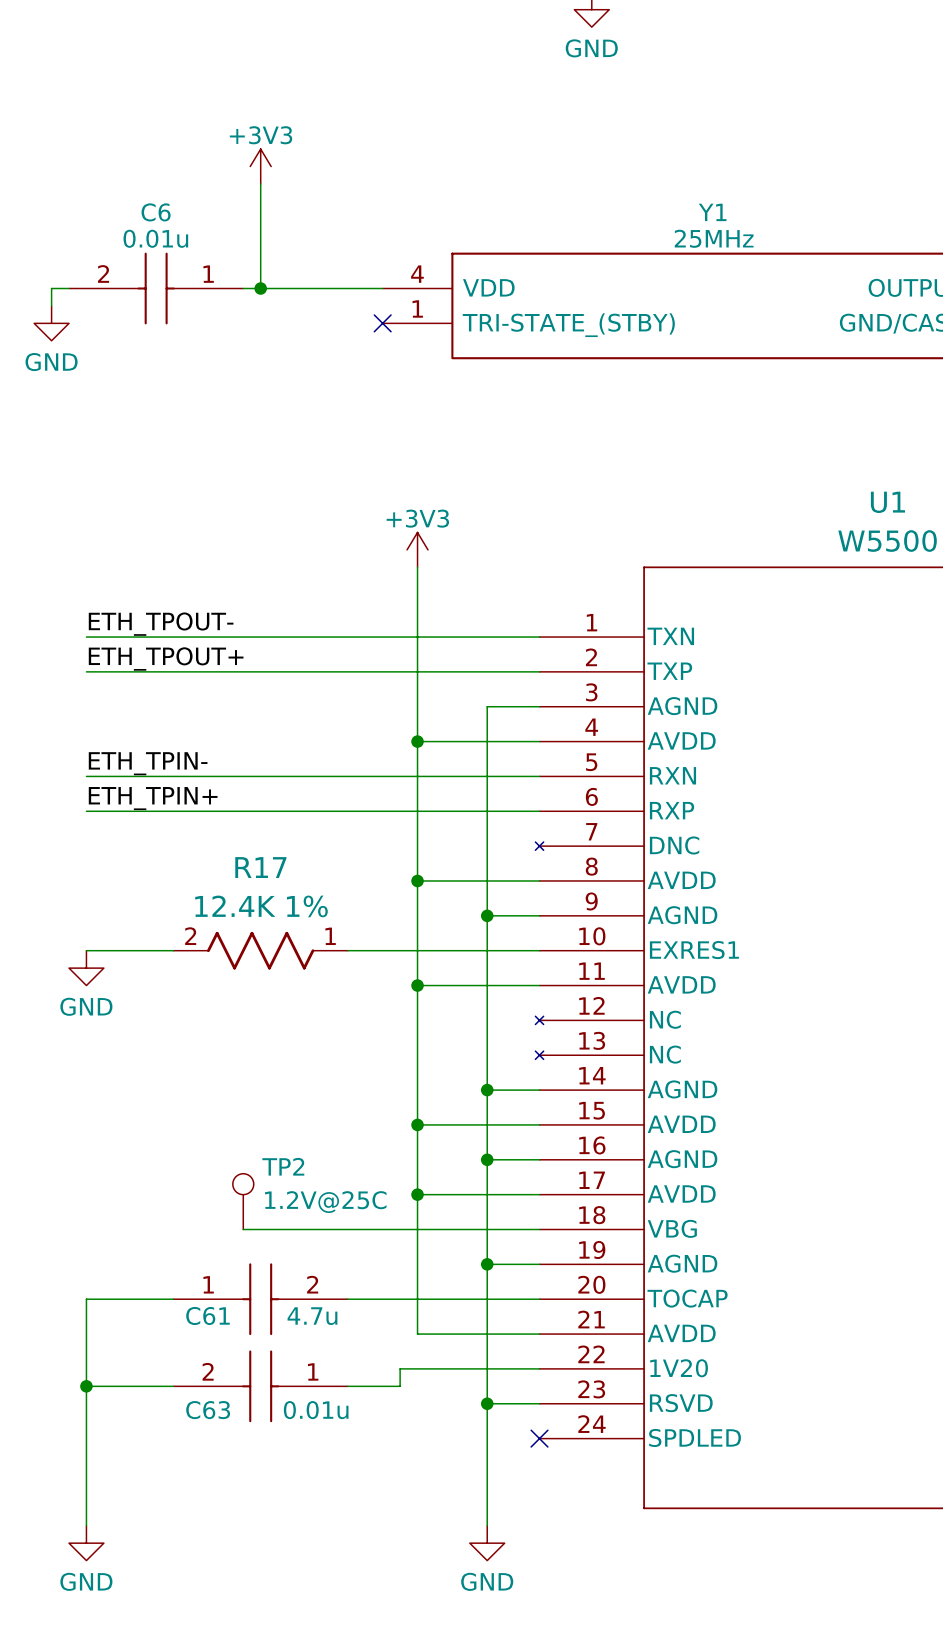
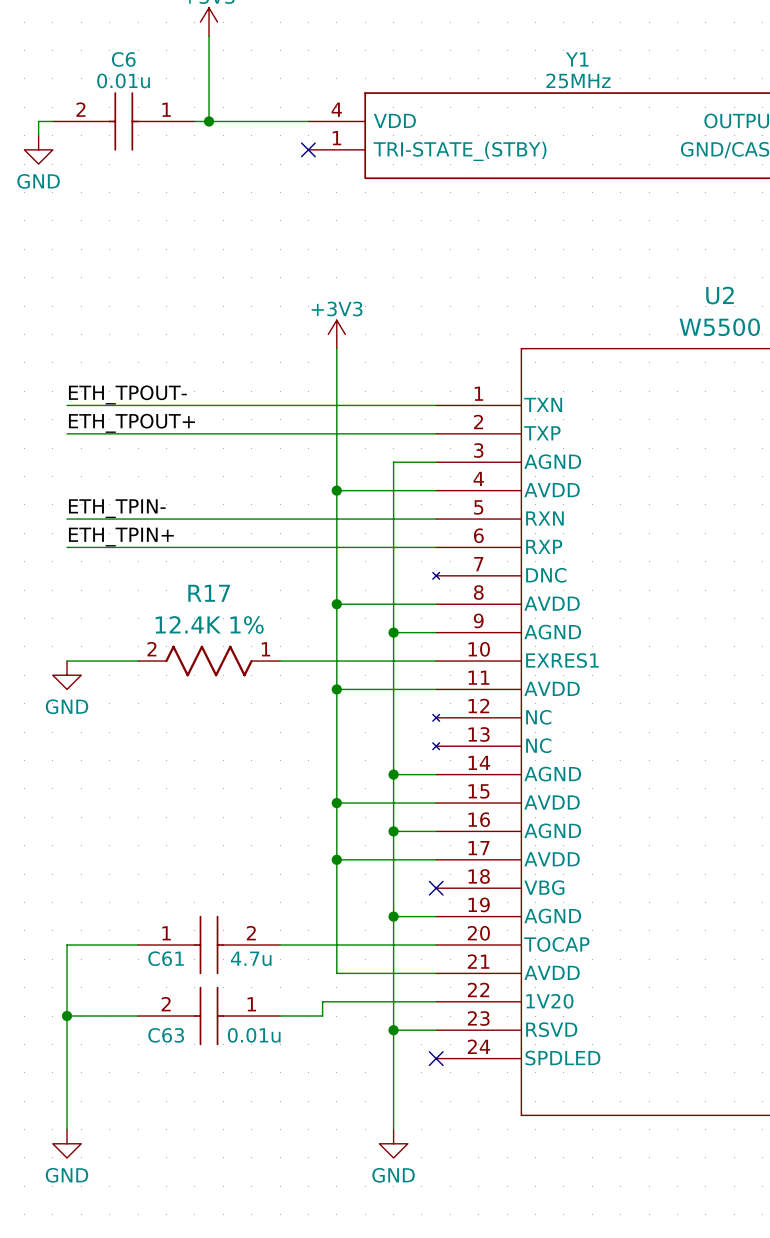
U1 name: U1 (887, 502) -> U2 (720, 295)
TP2: 1.2V@25C (243, 1201) -> none
wire: (243, 1229) (539, 1229) -> none
no-connect mark: none -> (436, 888)

